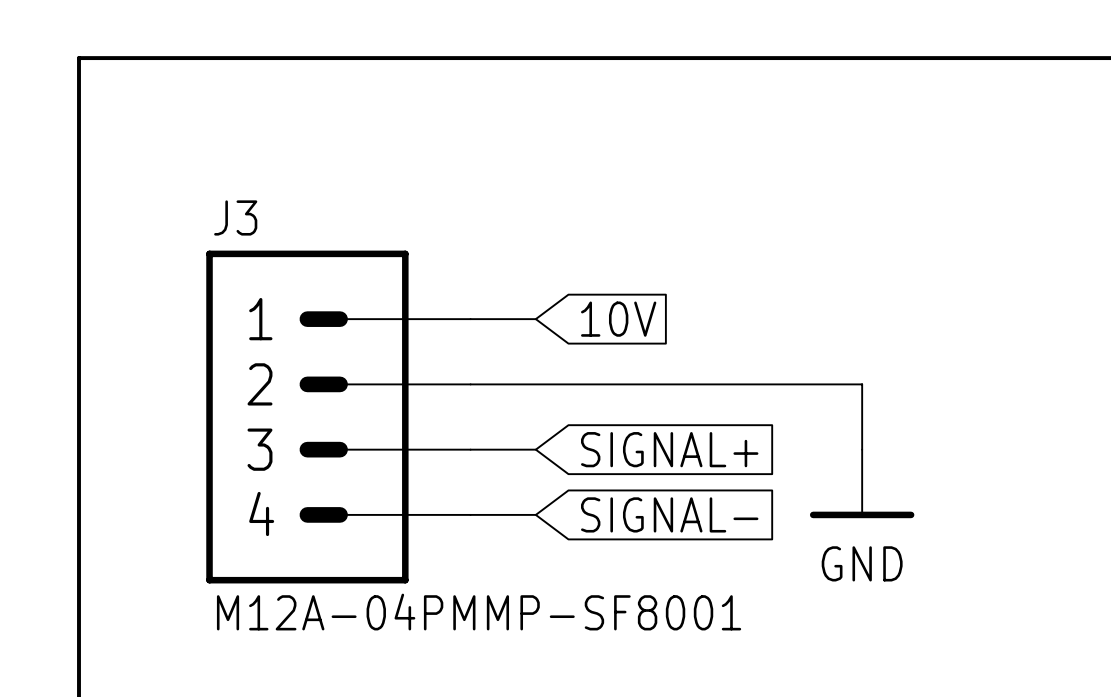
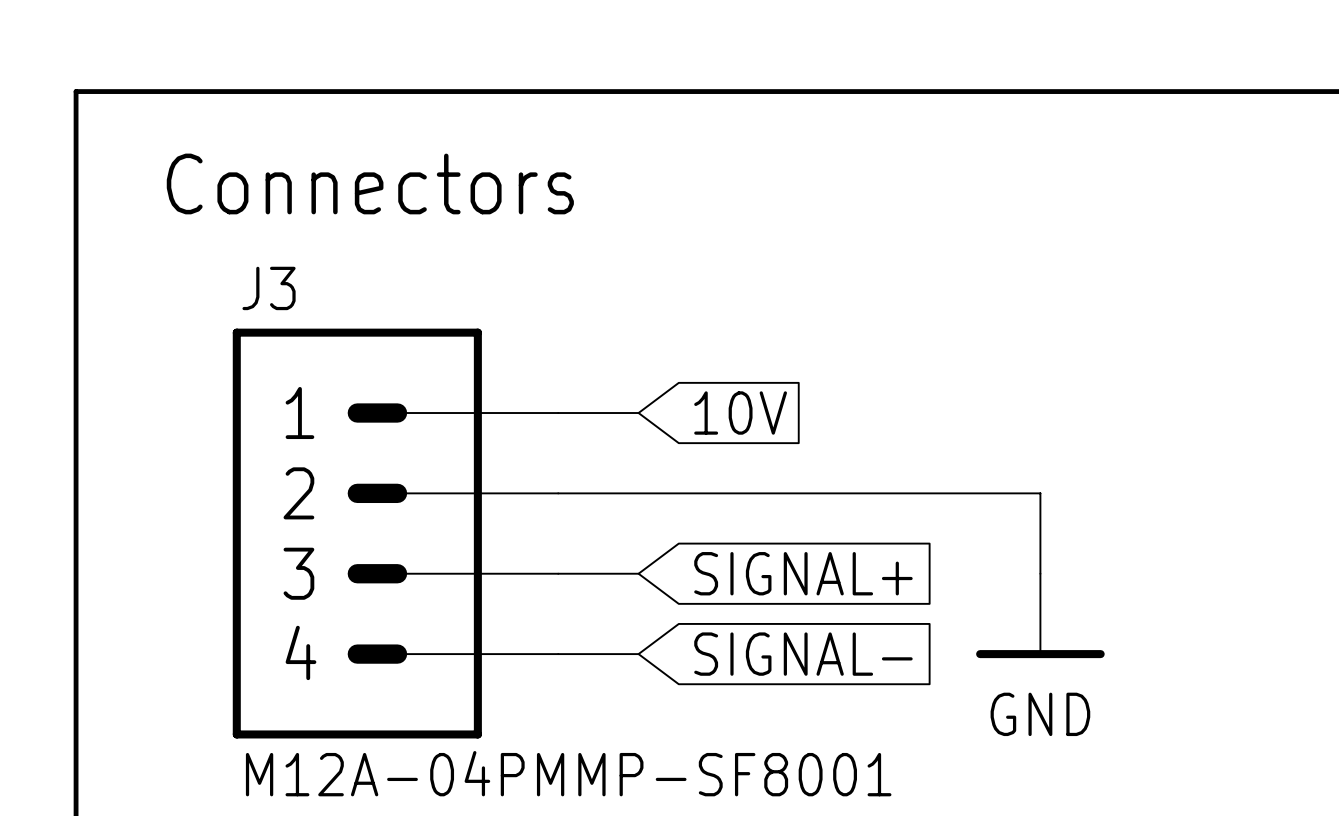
text: none -> Connectors (370, 183)

